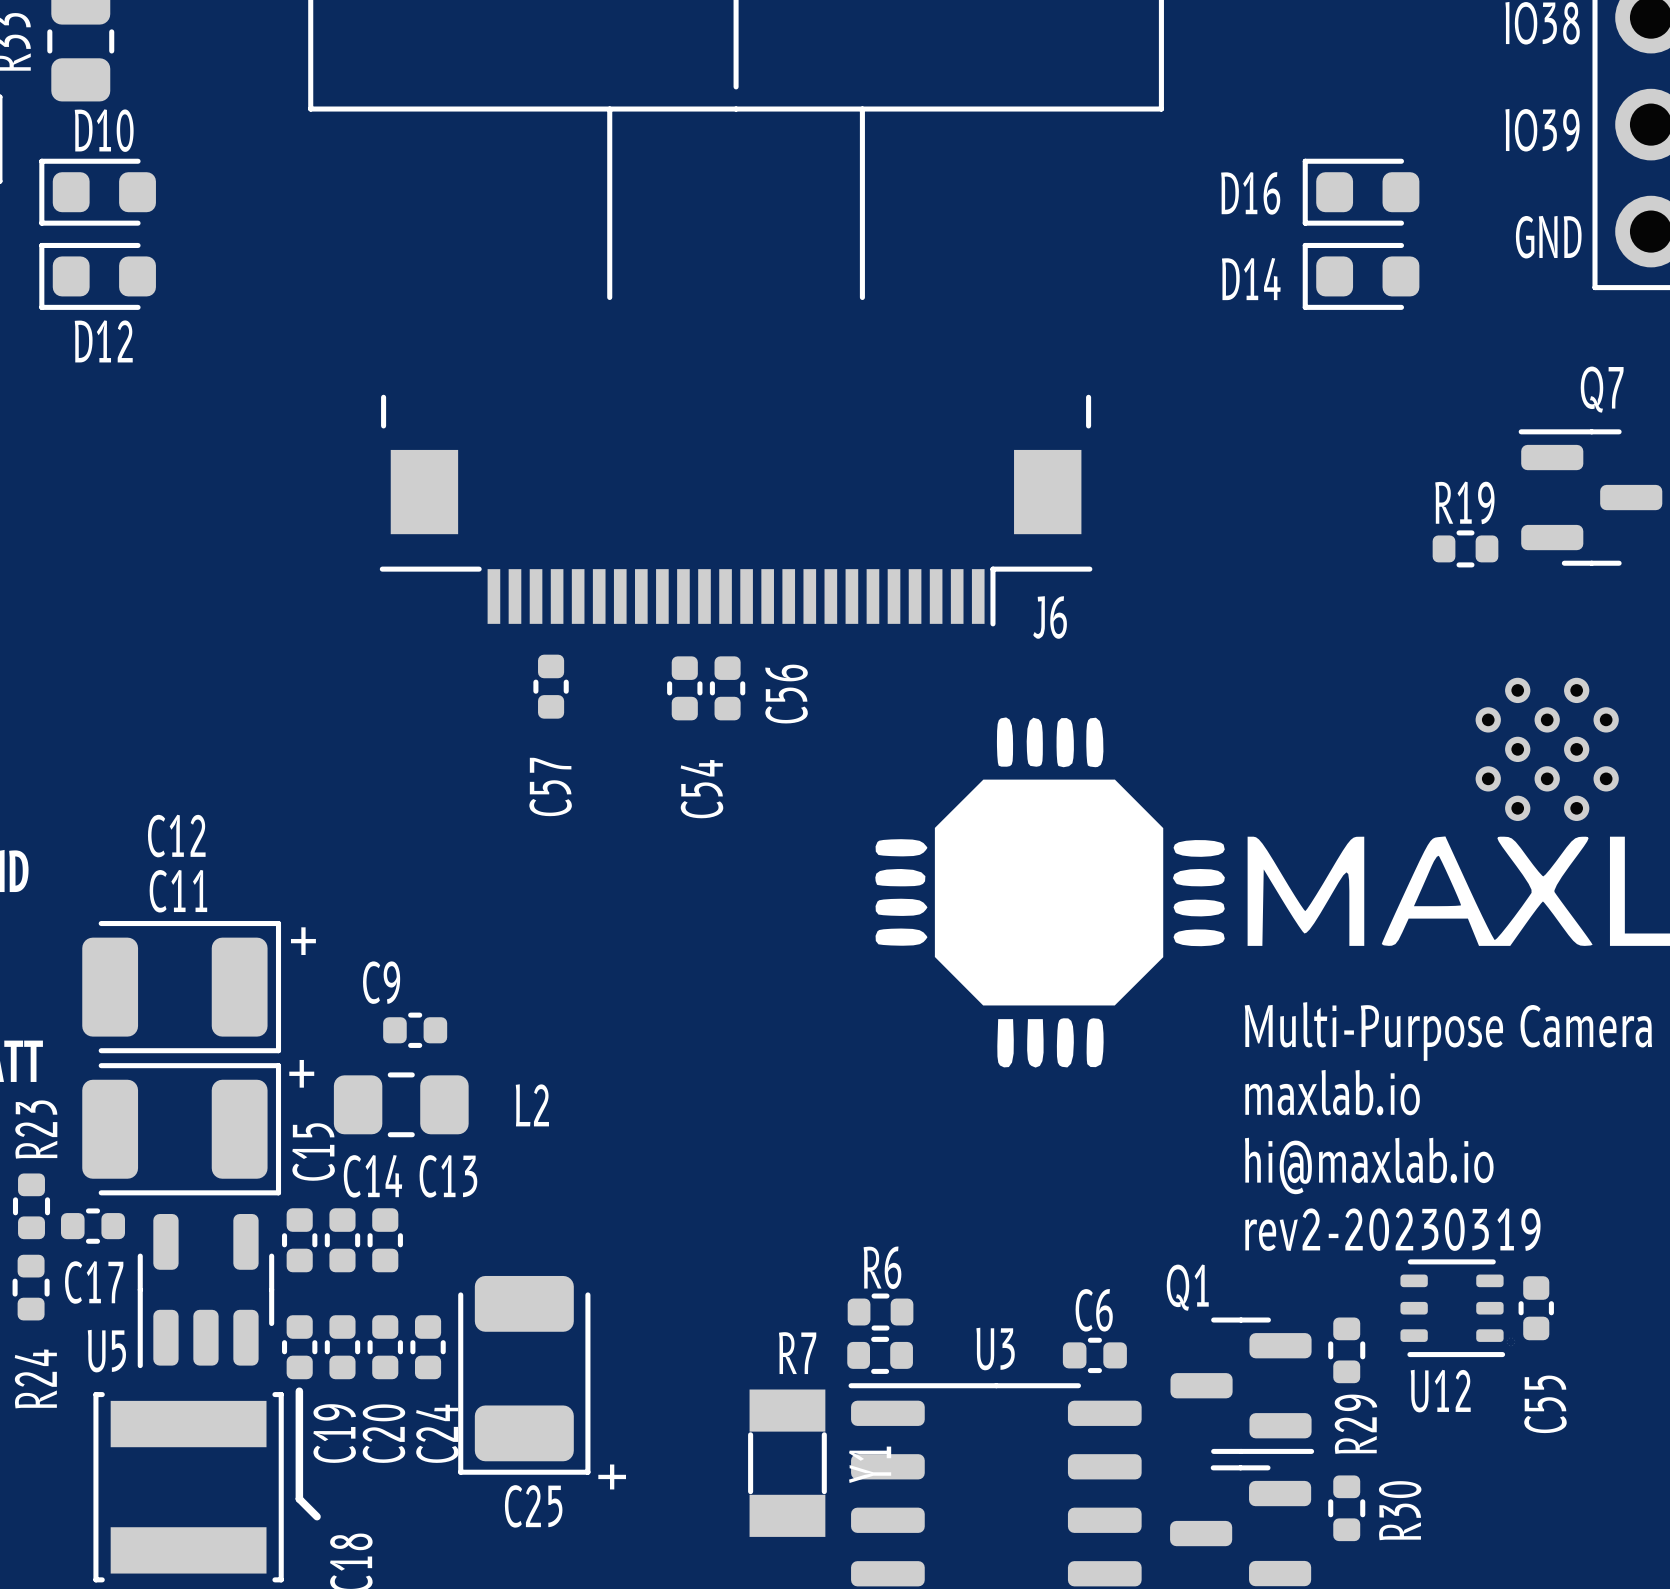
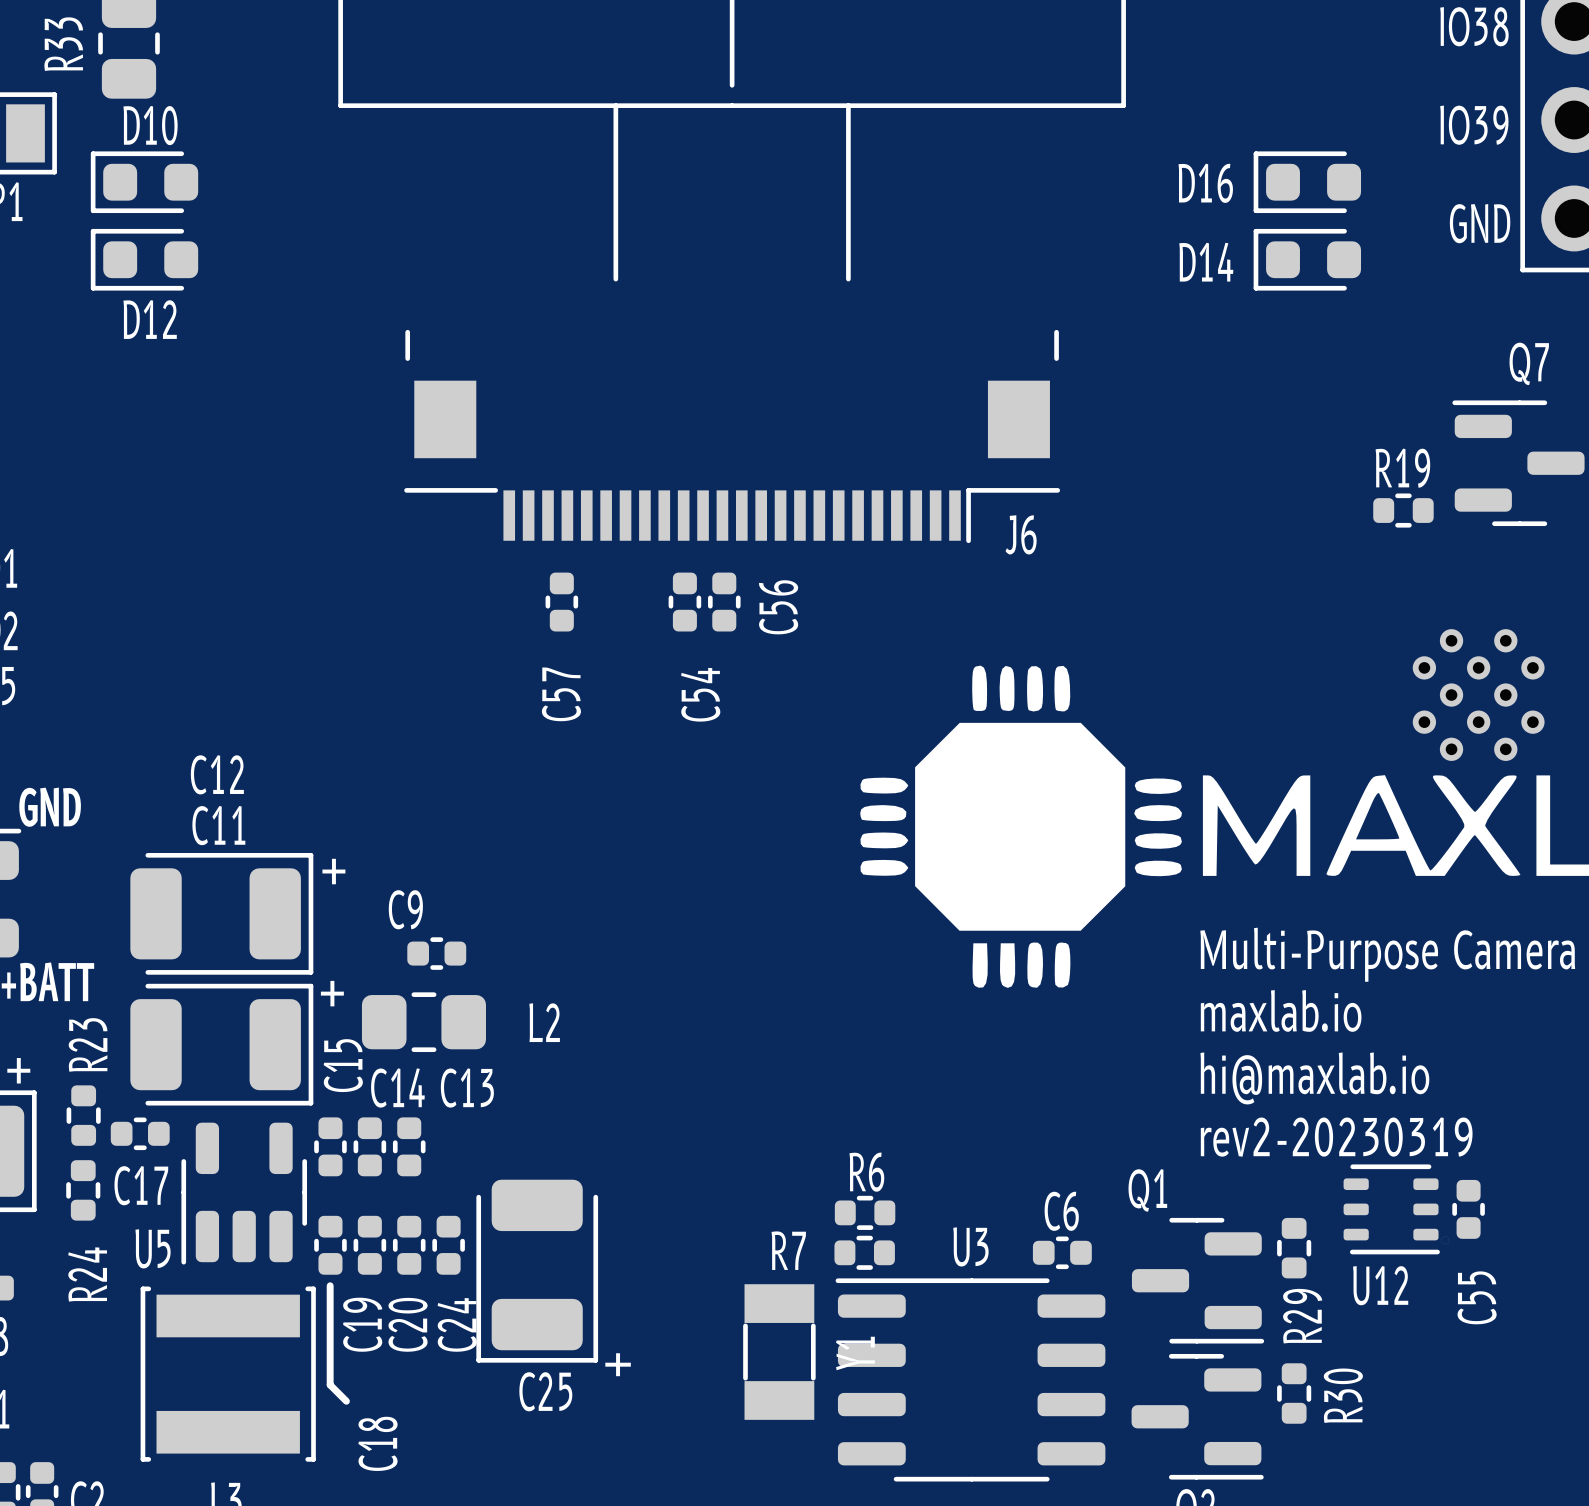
J6 position: (736, 510) -> (732, 436)
C57 position: (551, 686) -> (561, 602)
C54 position: (684, 688) -> (684, 602)
C56 position: (727, 688) -> (724, 602)

